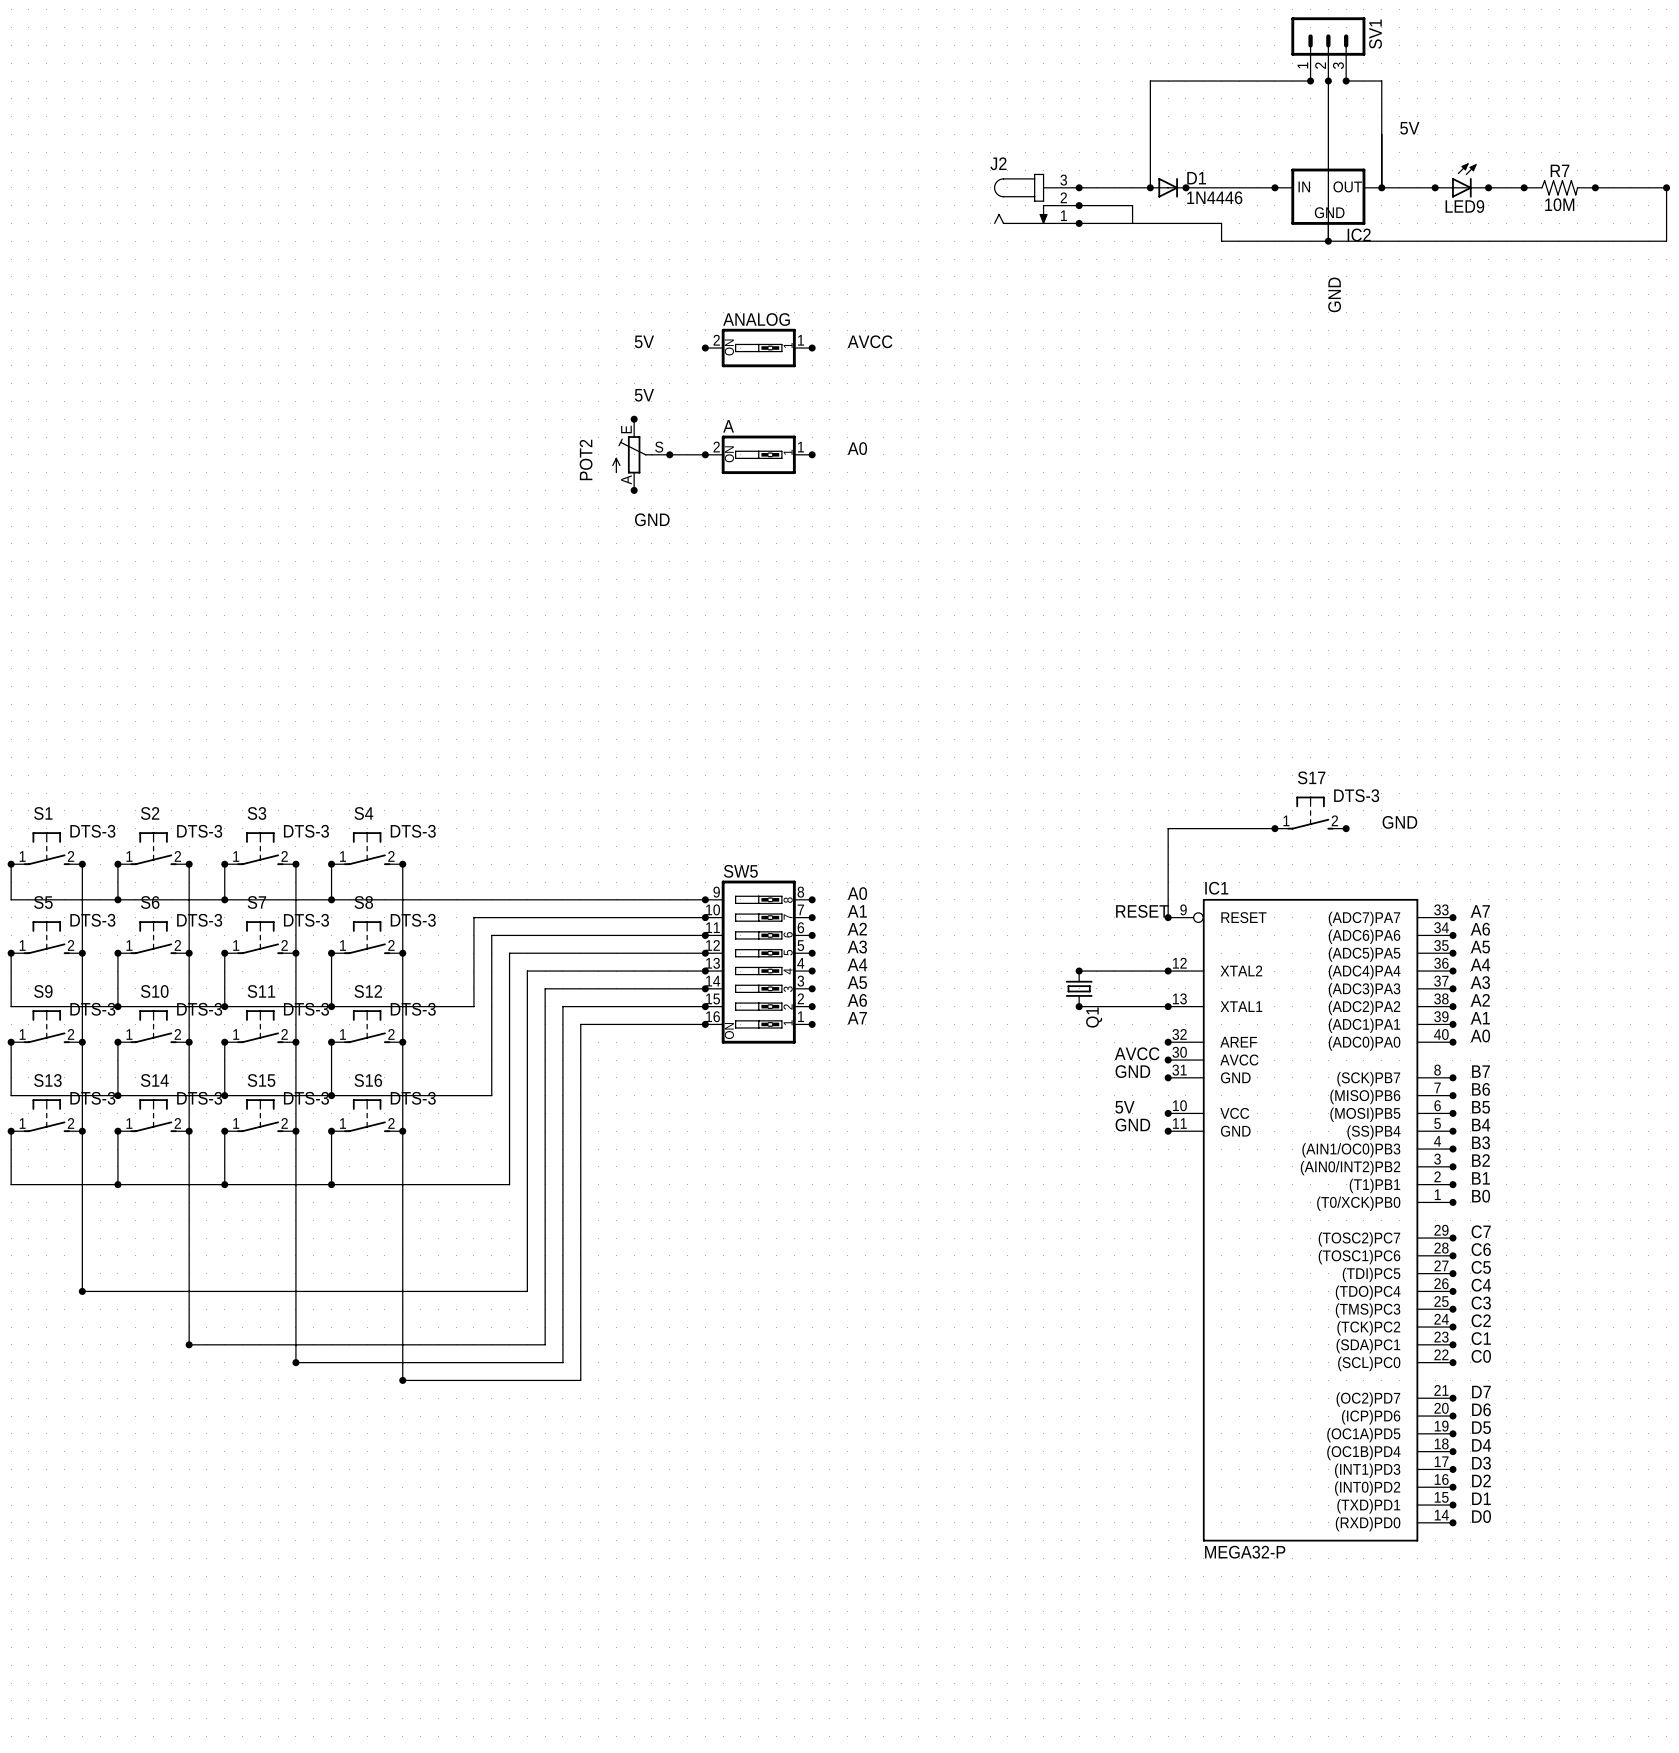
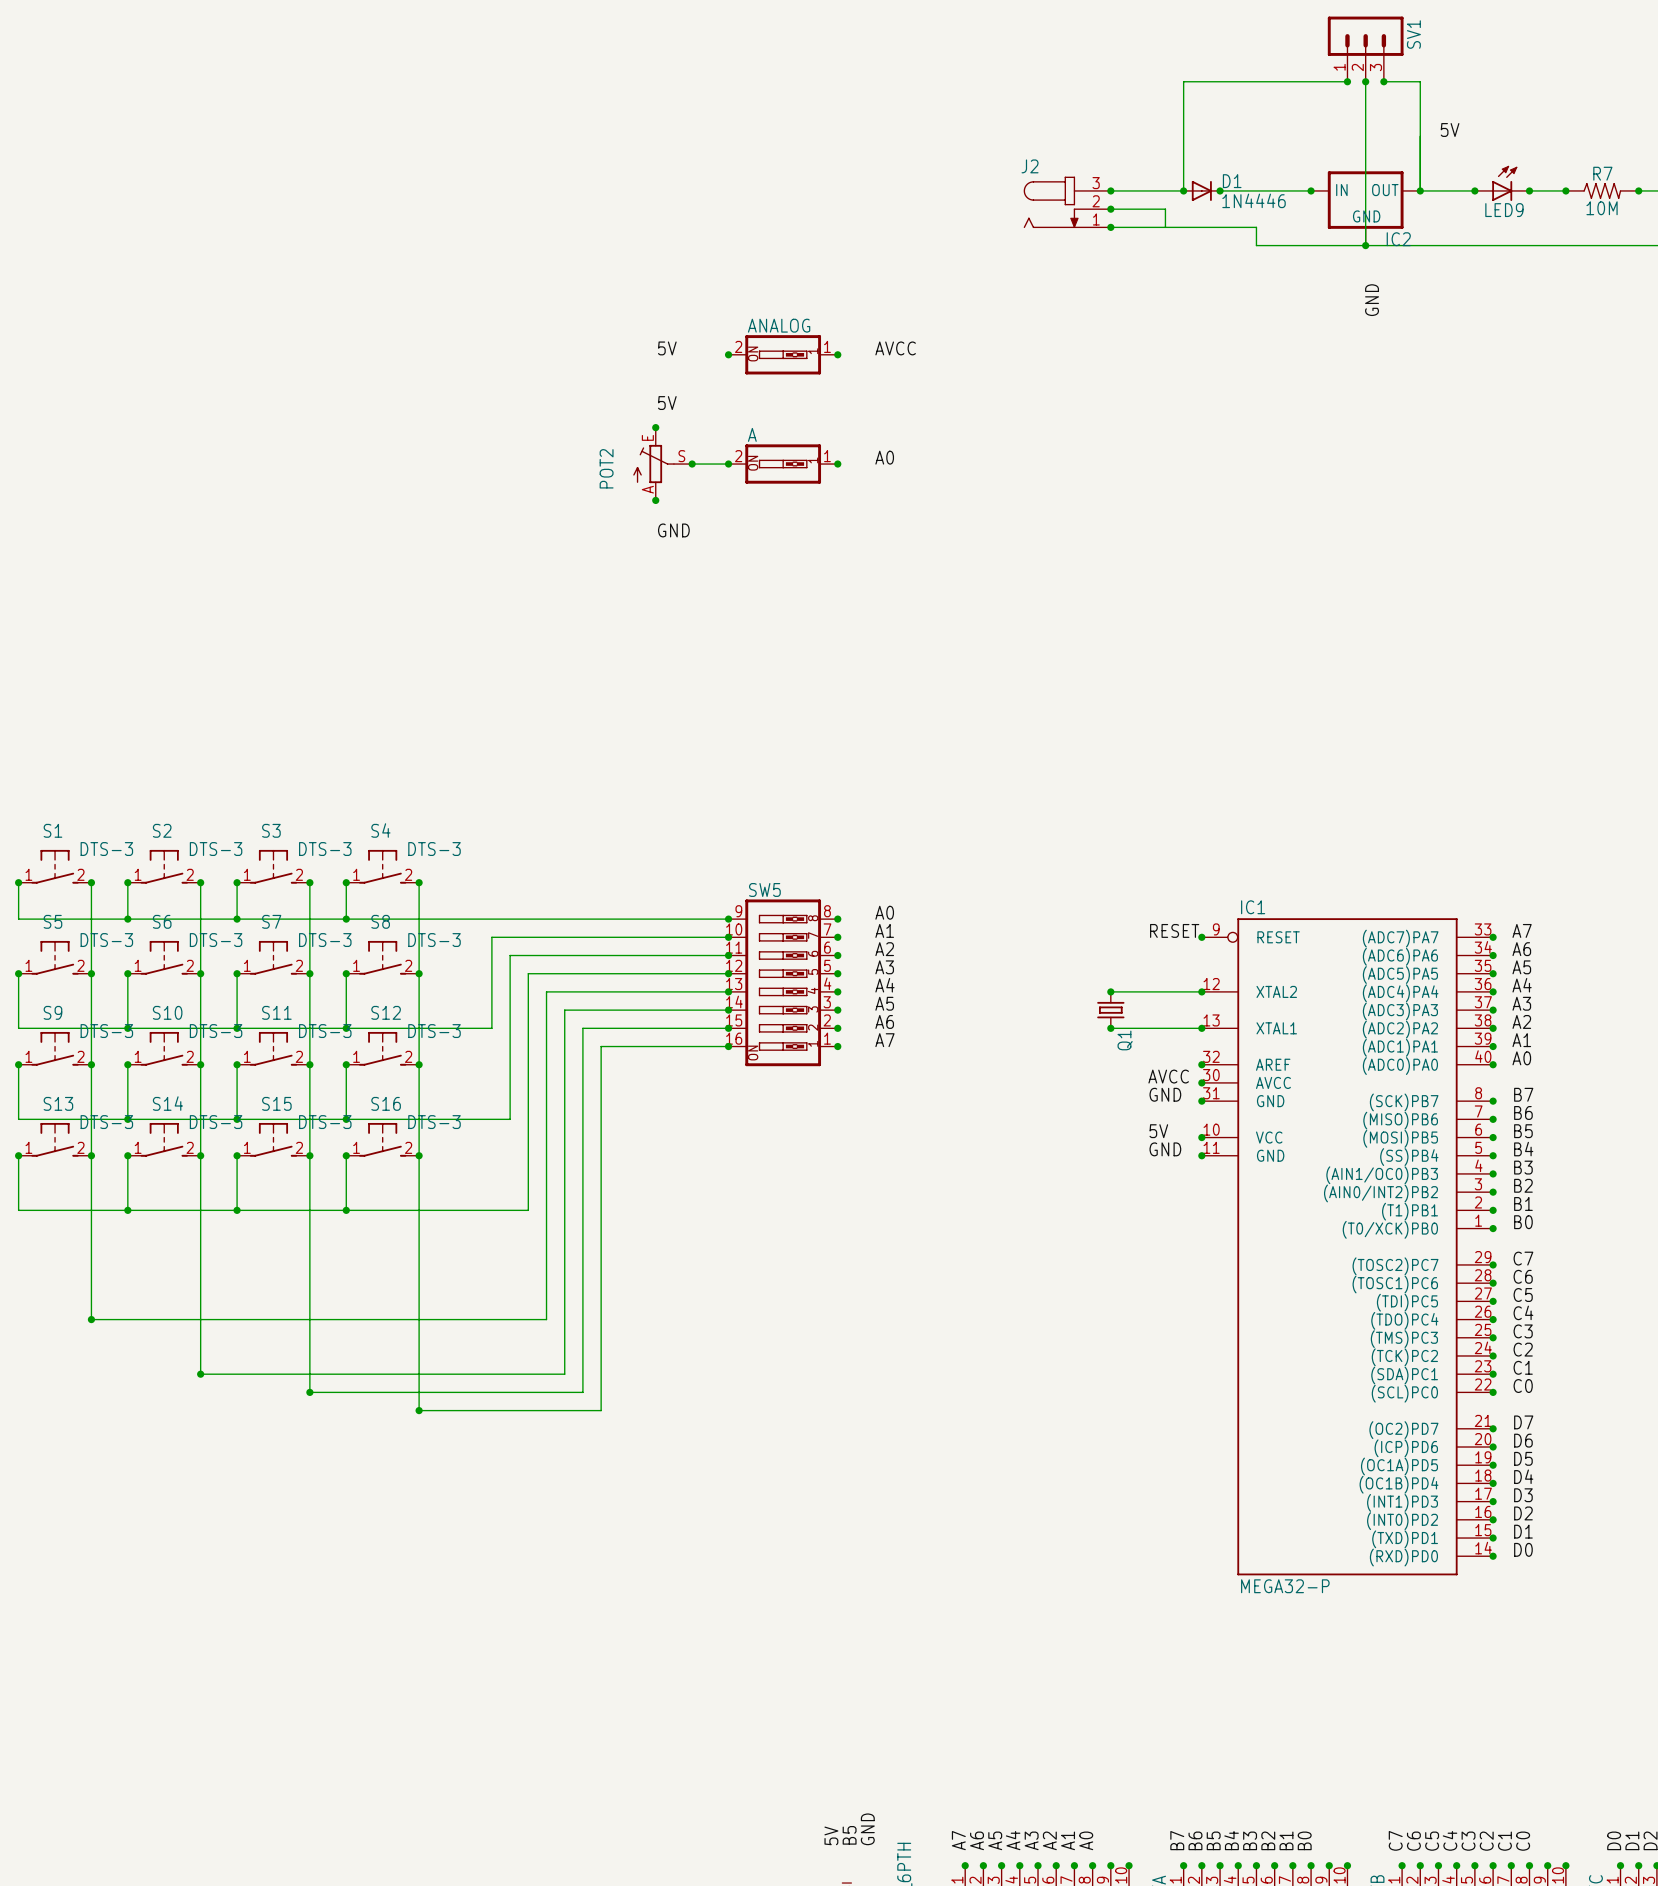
S17: DTS-3 (1310, 813) -> none
label: GND (1399, 822) -> none
wire: (1274, 828) (1168, 828) (1168, 917) -> none
junction: (1274, 828) -> none
junction: (1346, 828) -> none

